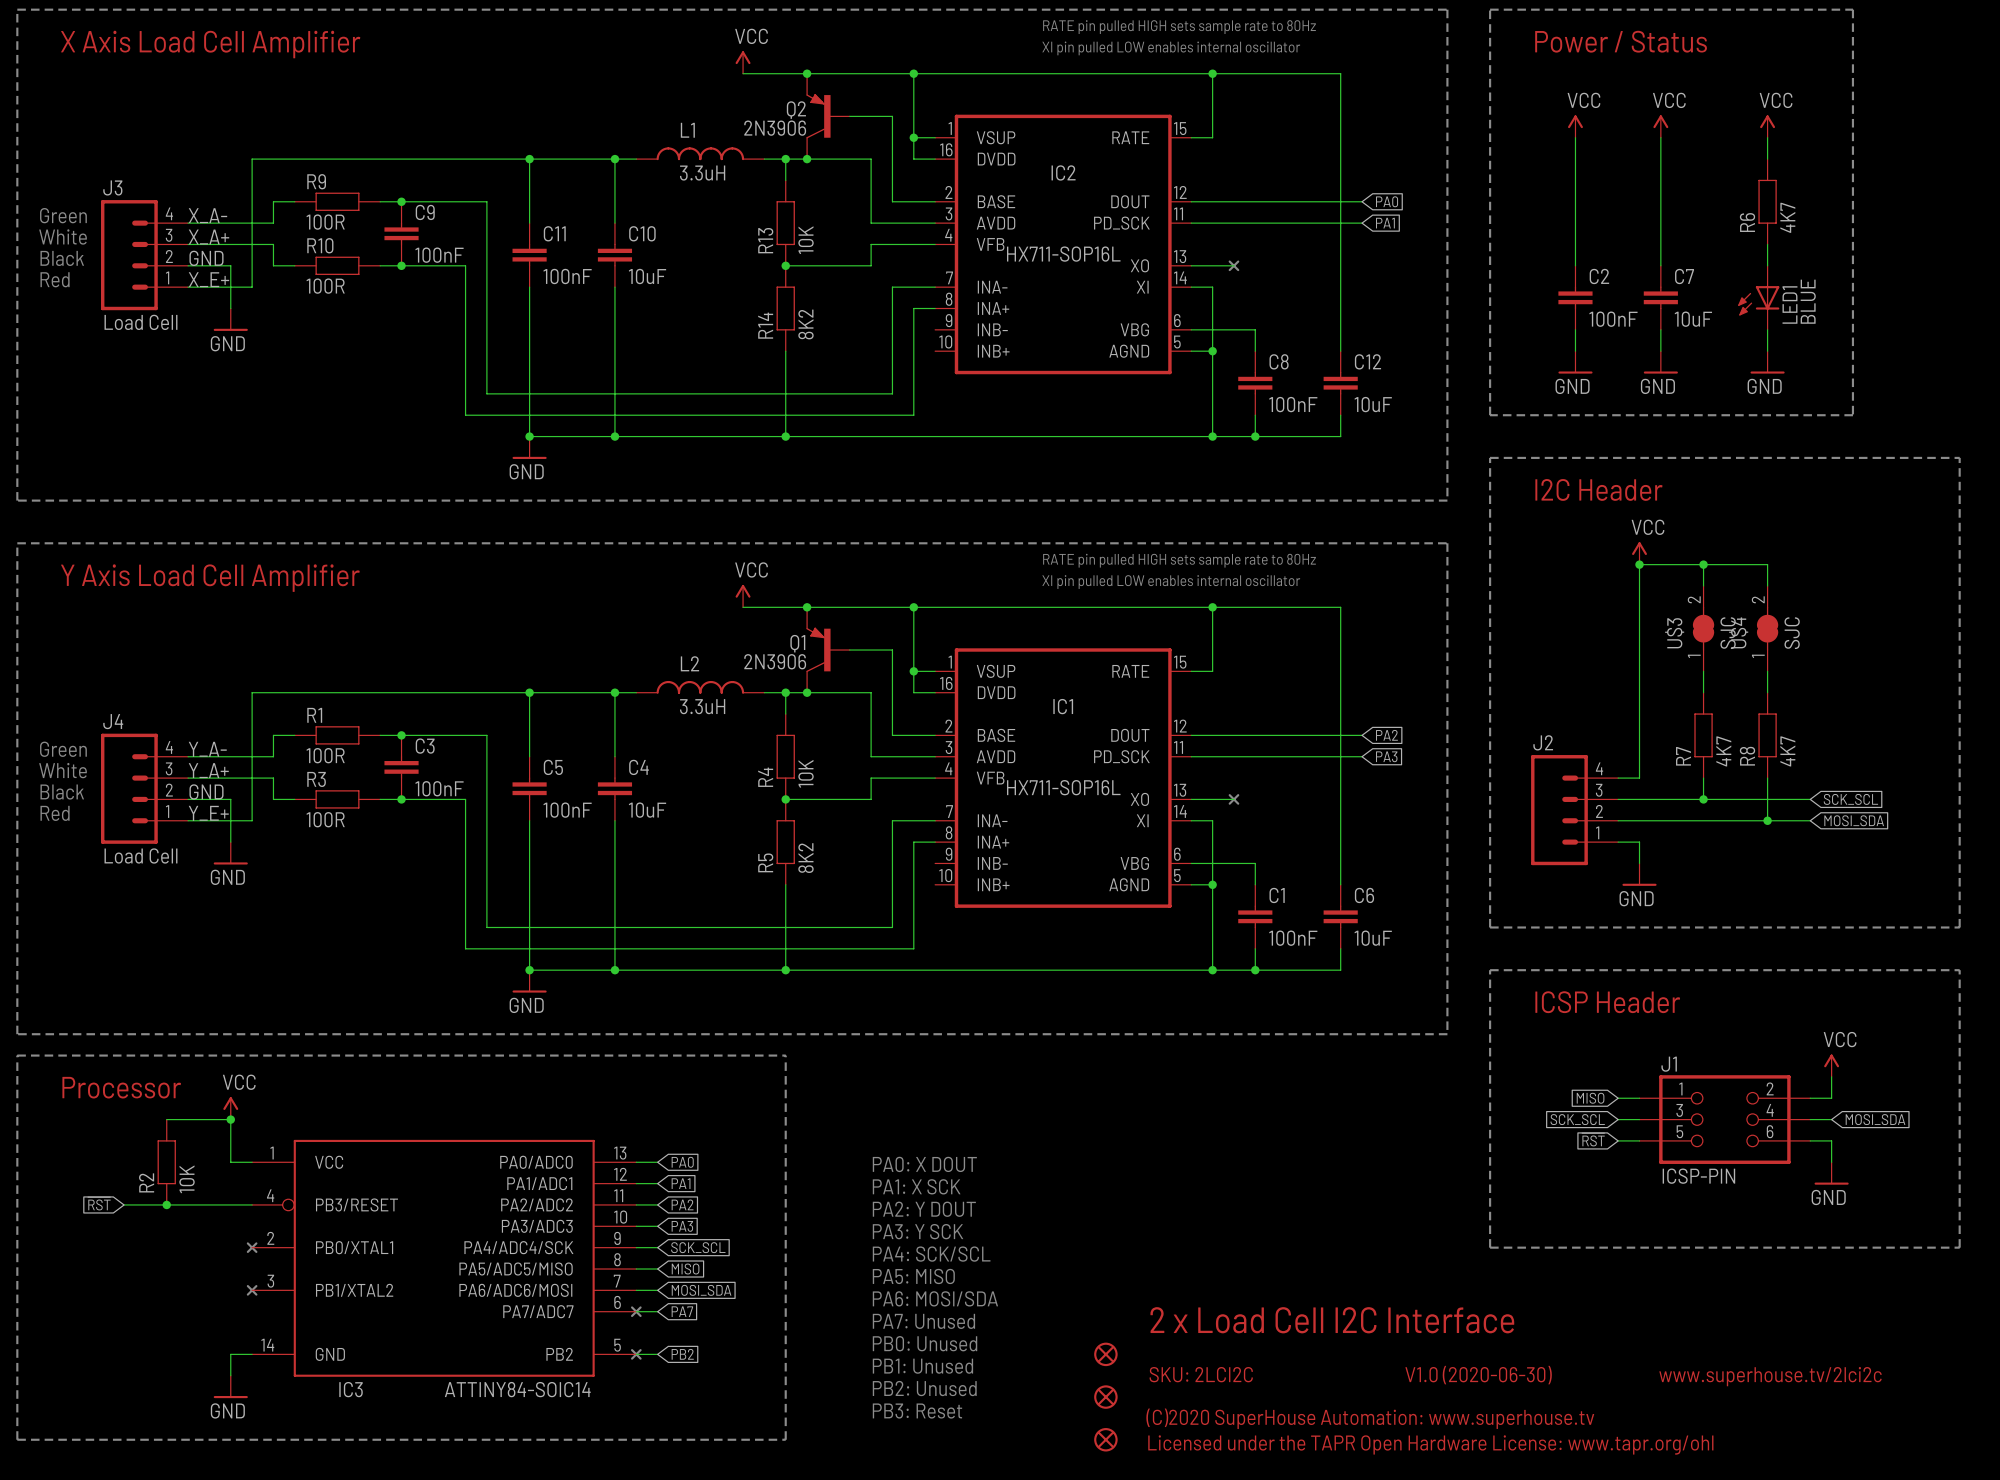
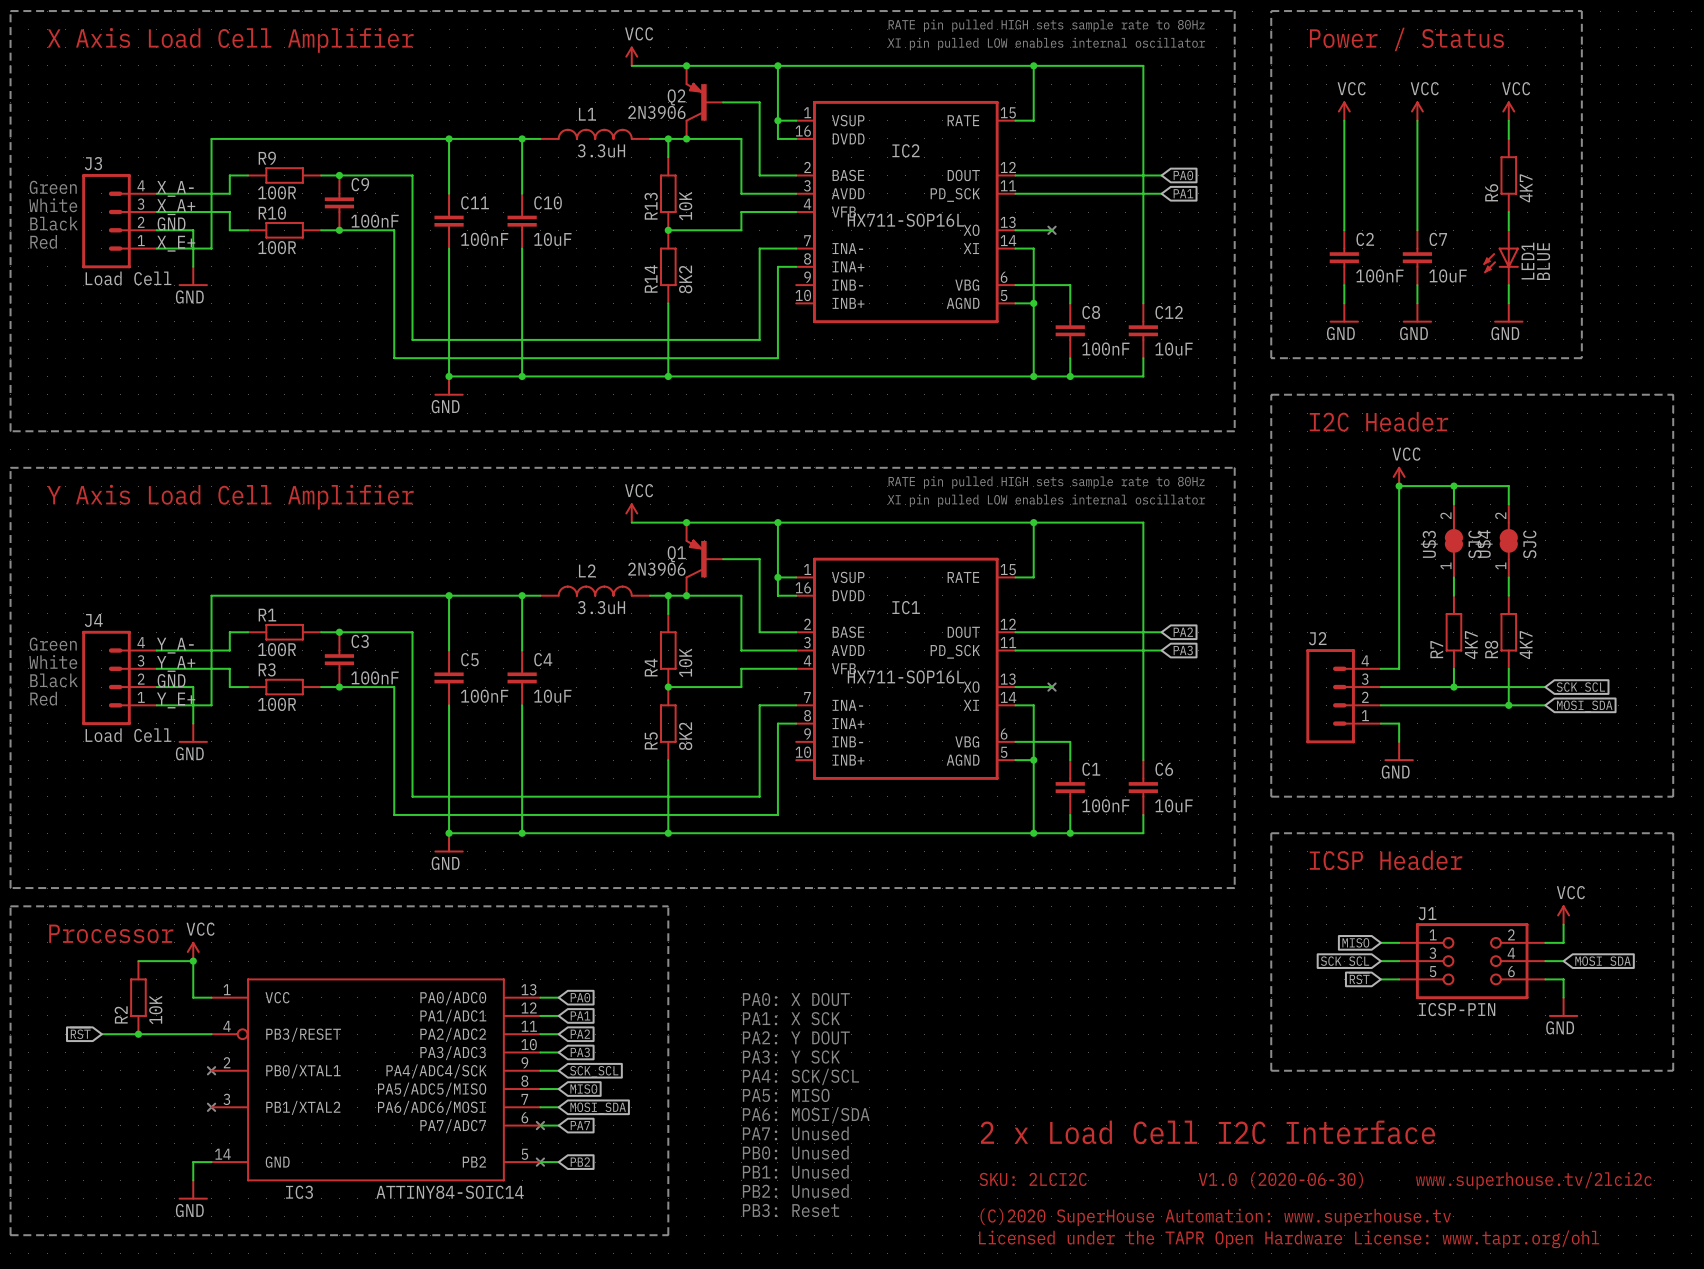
part: (1105, 1354) -> none
part: (1105, 1397) -> none
part: (1105, 1439) -> none

